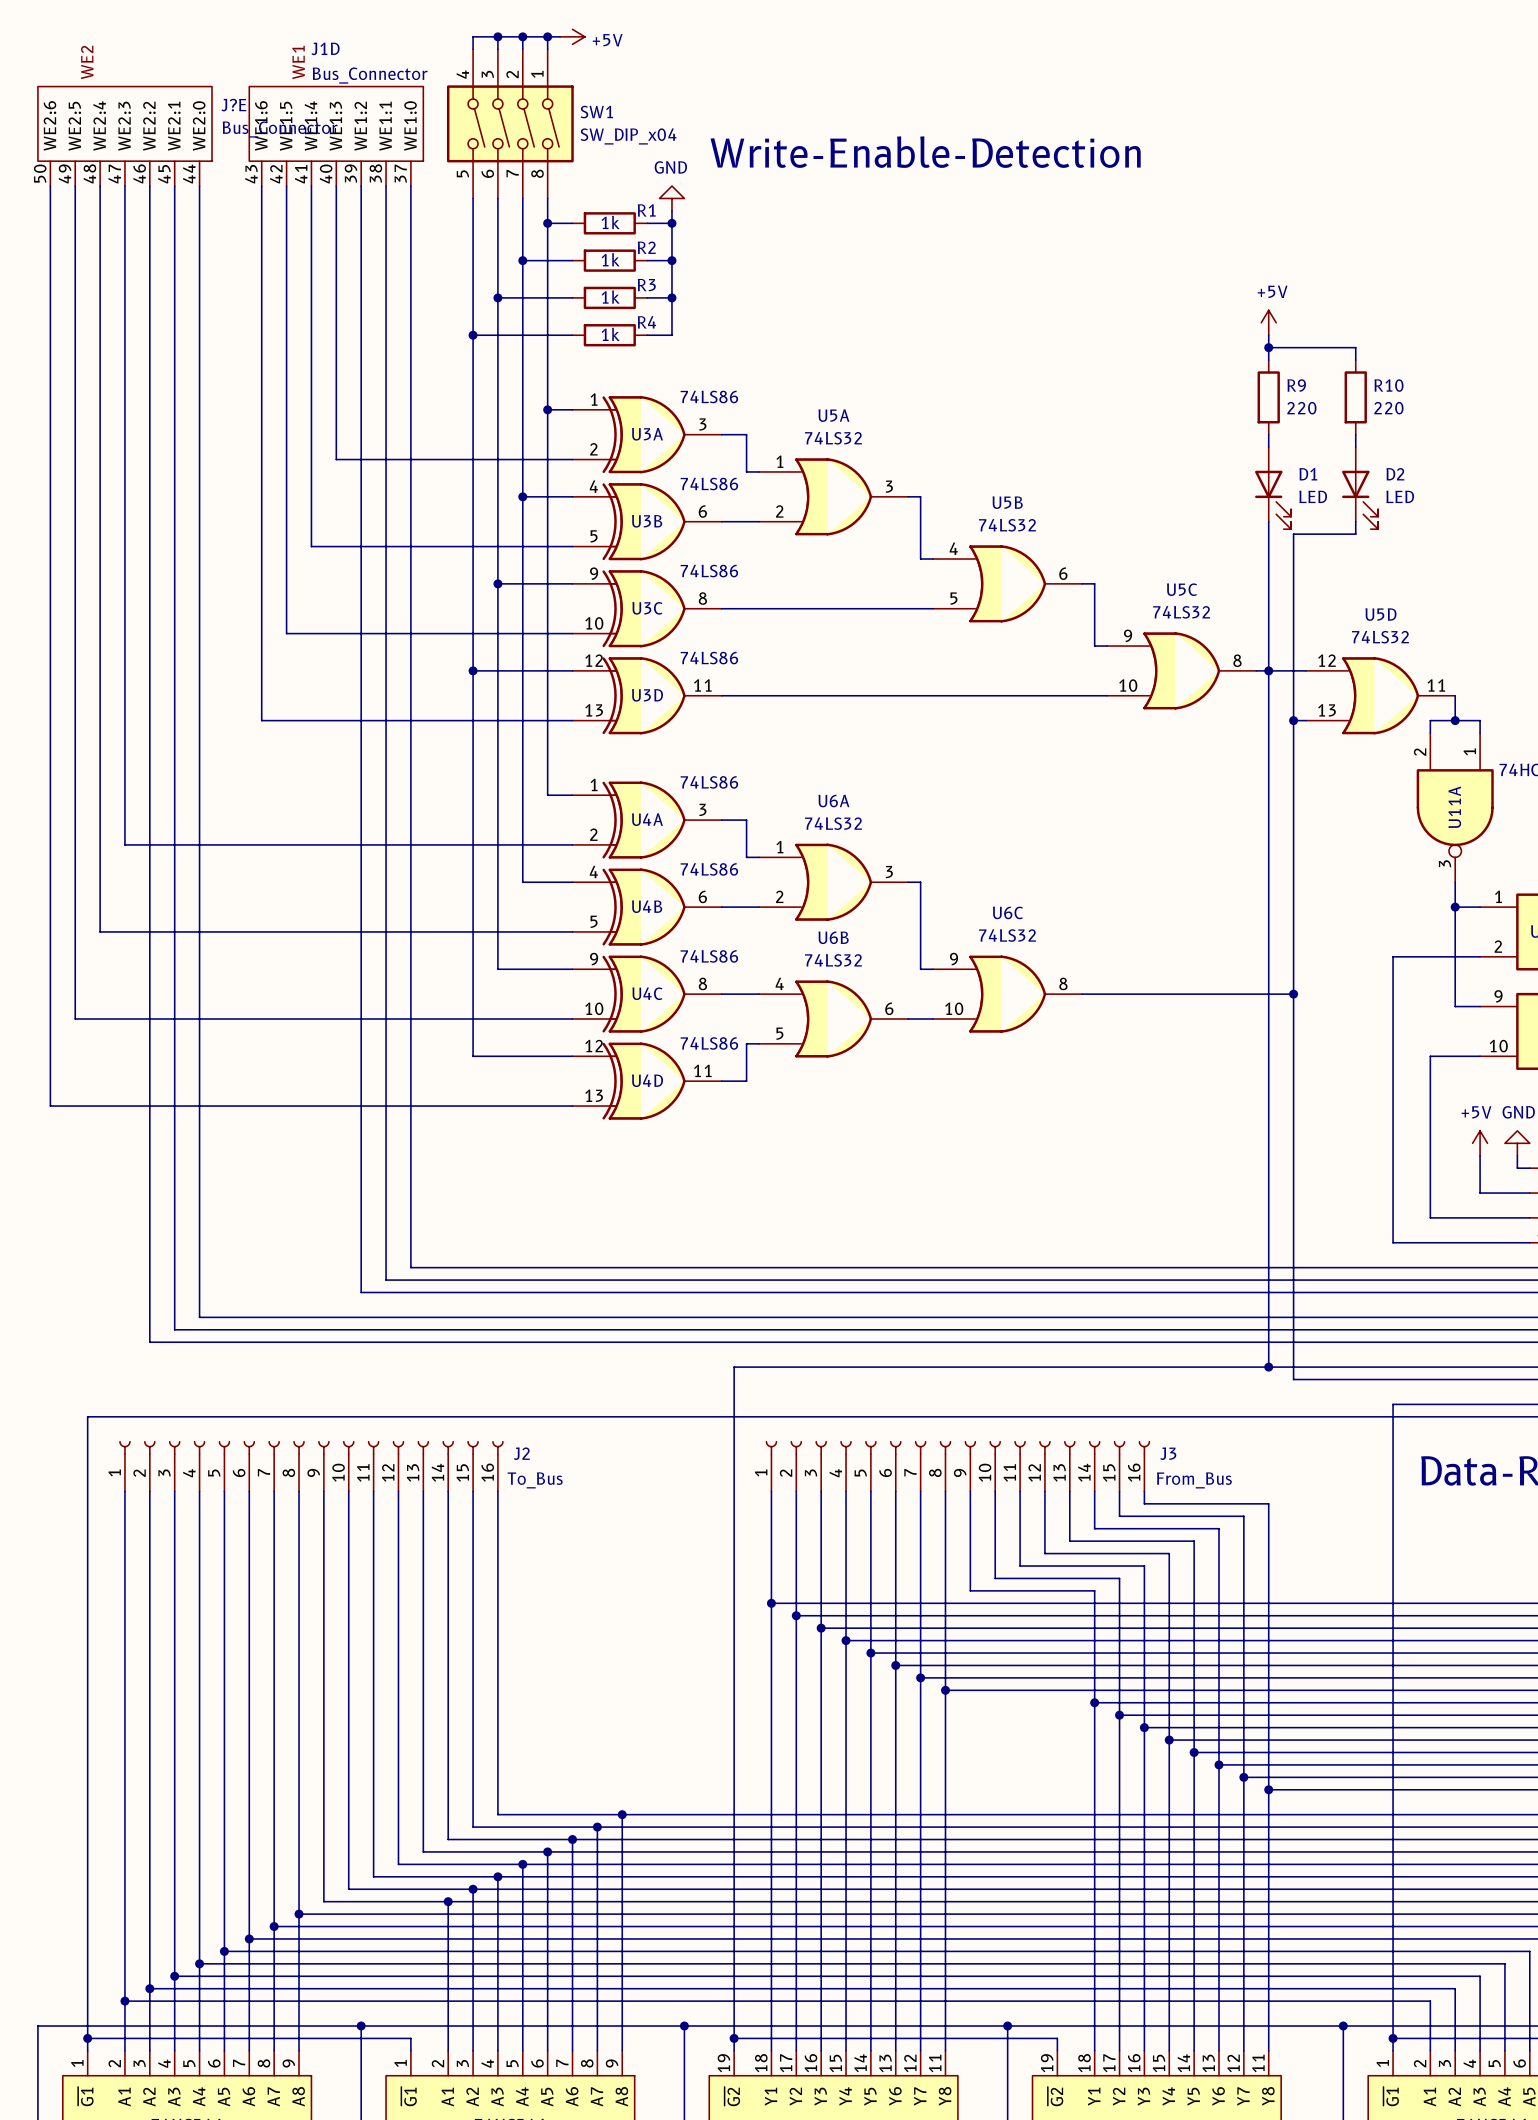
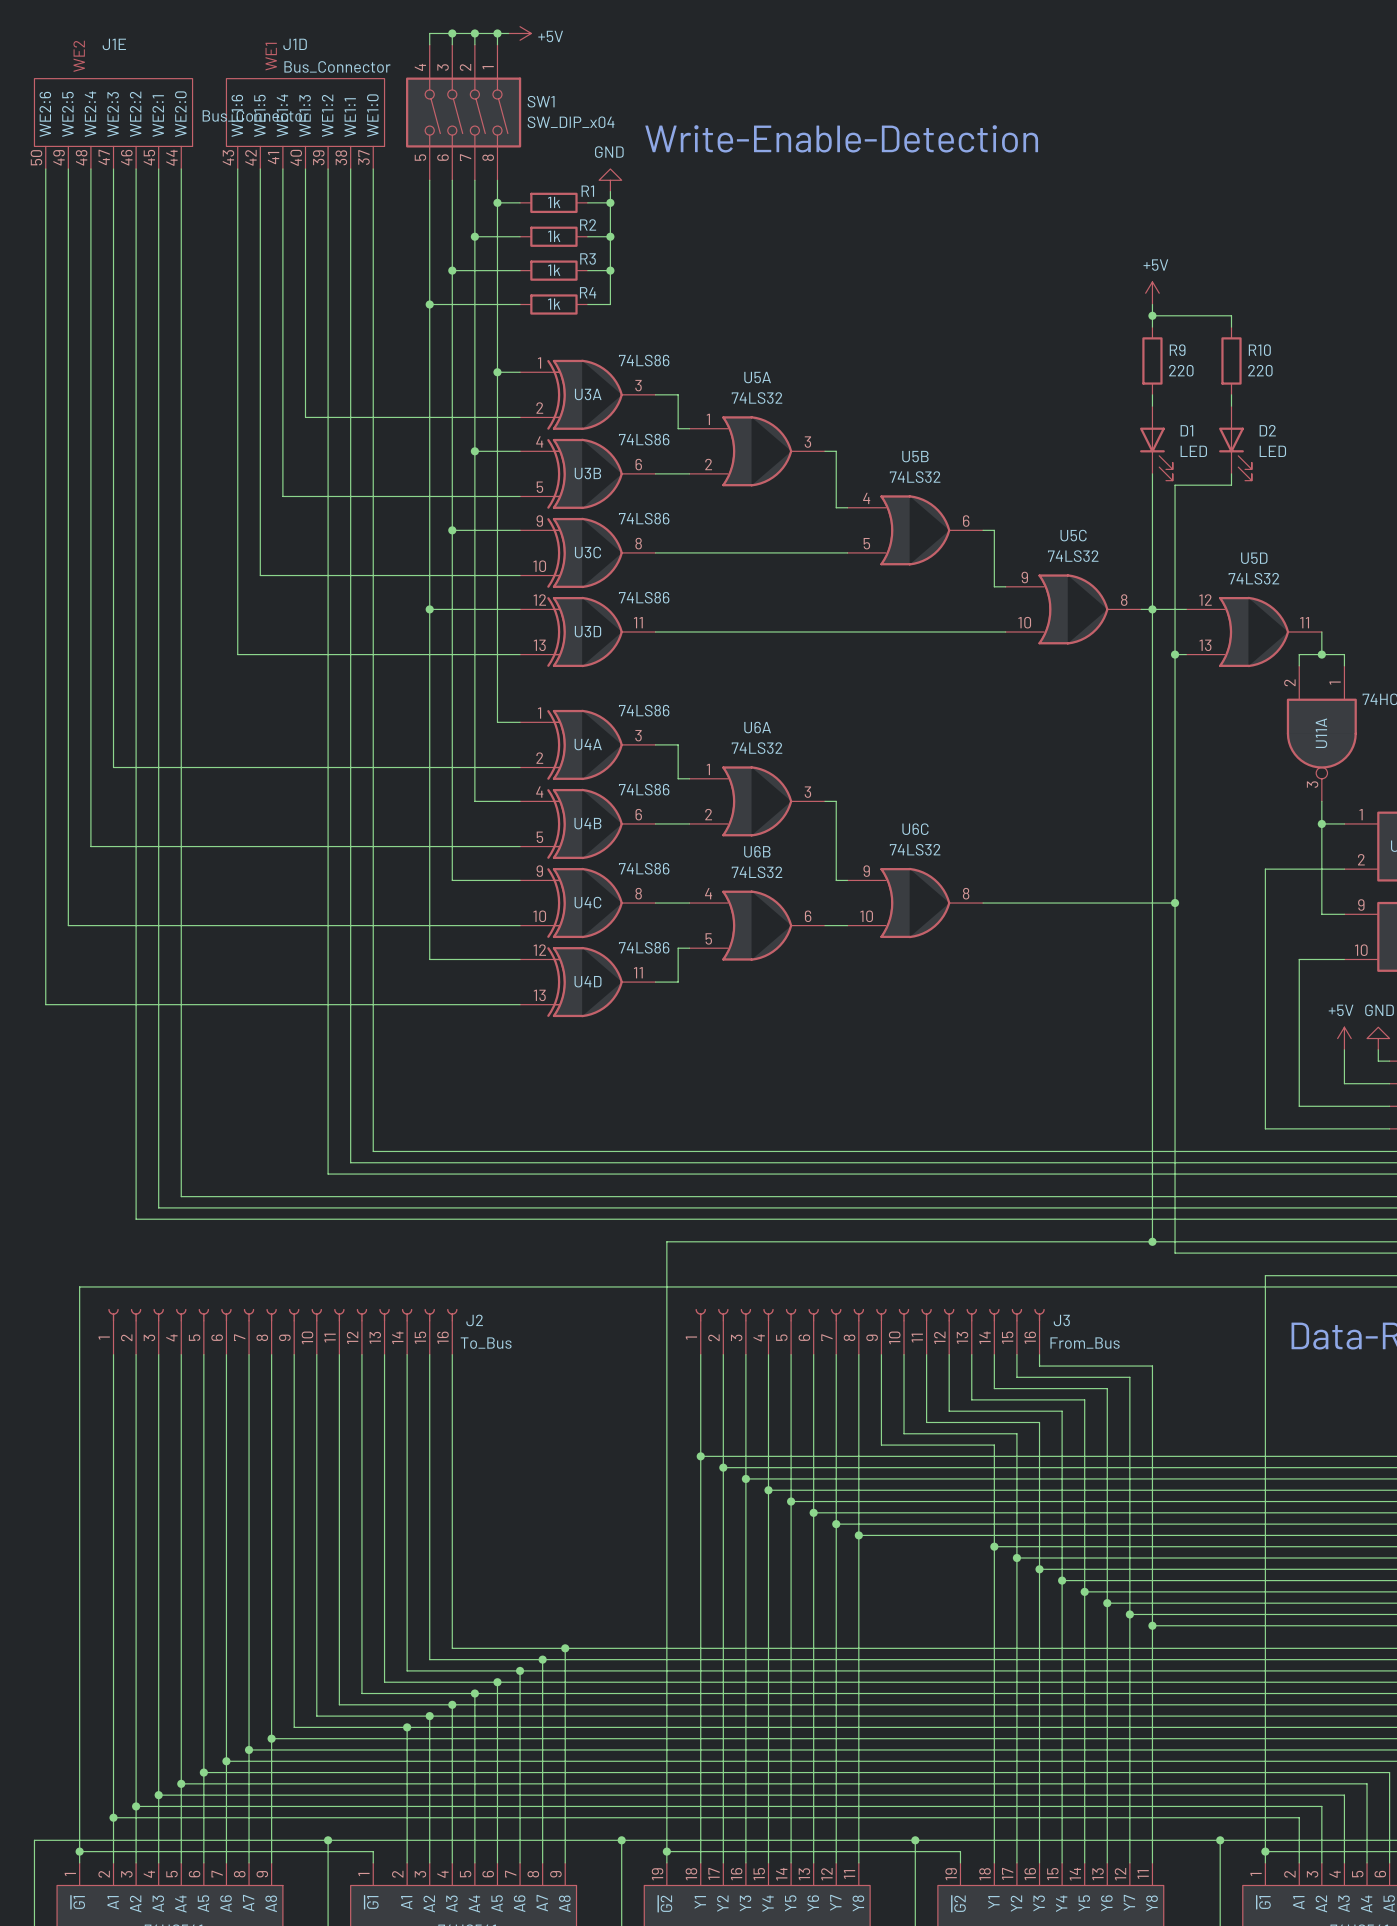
J?E name: J?E (233, 105) -> J1E (114, 44)

